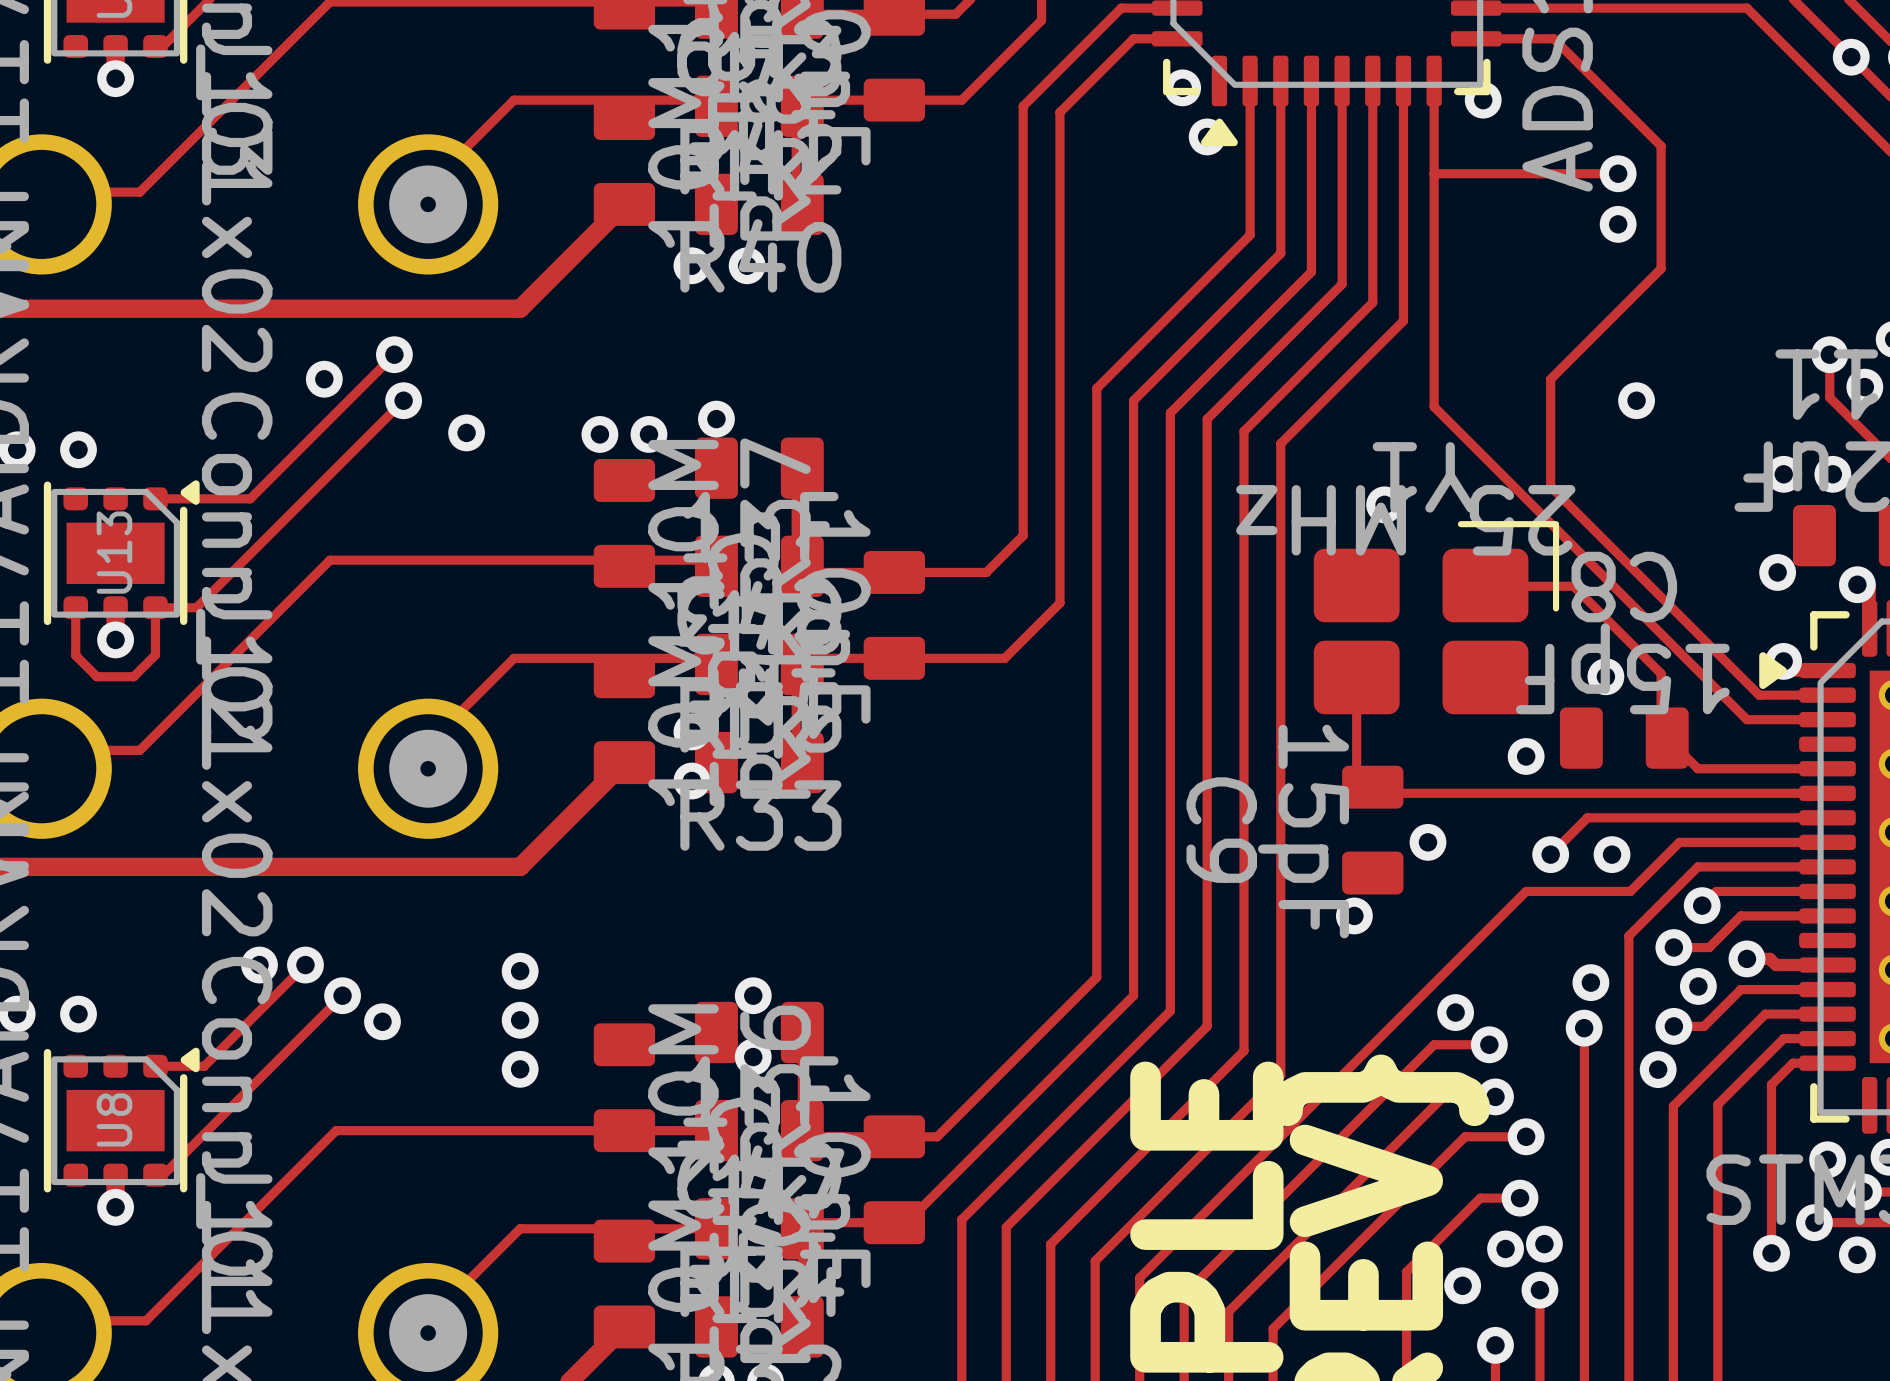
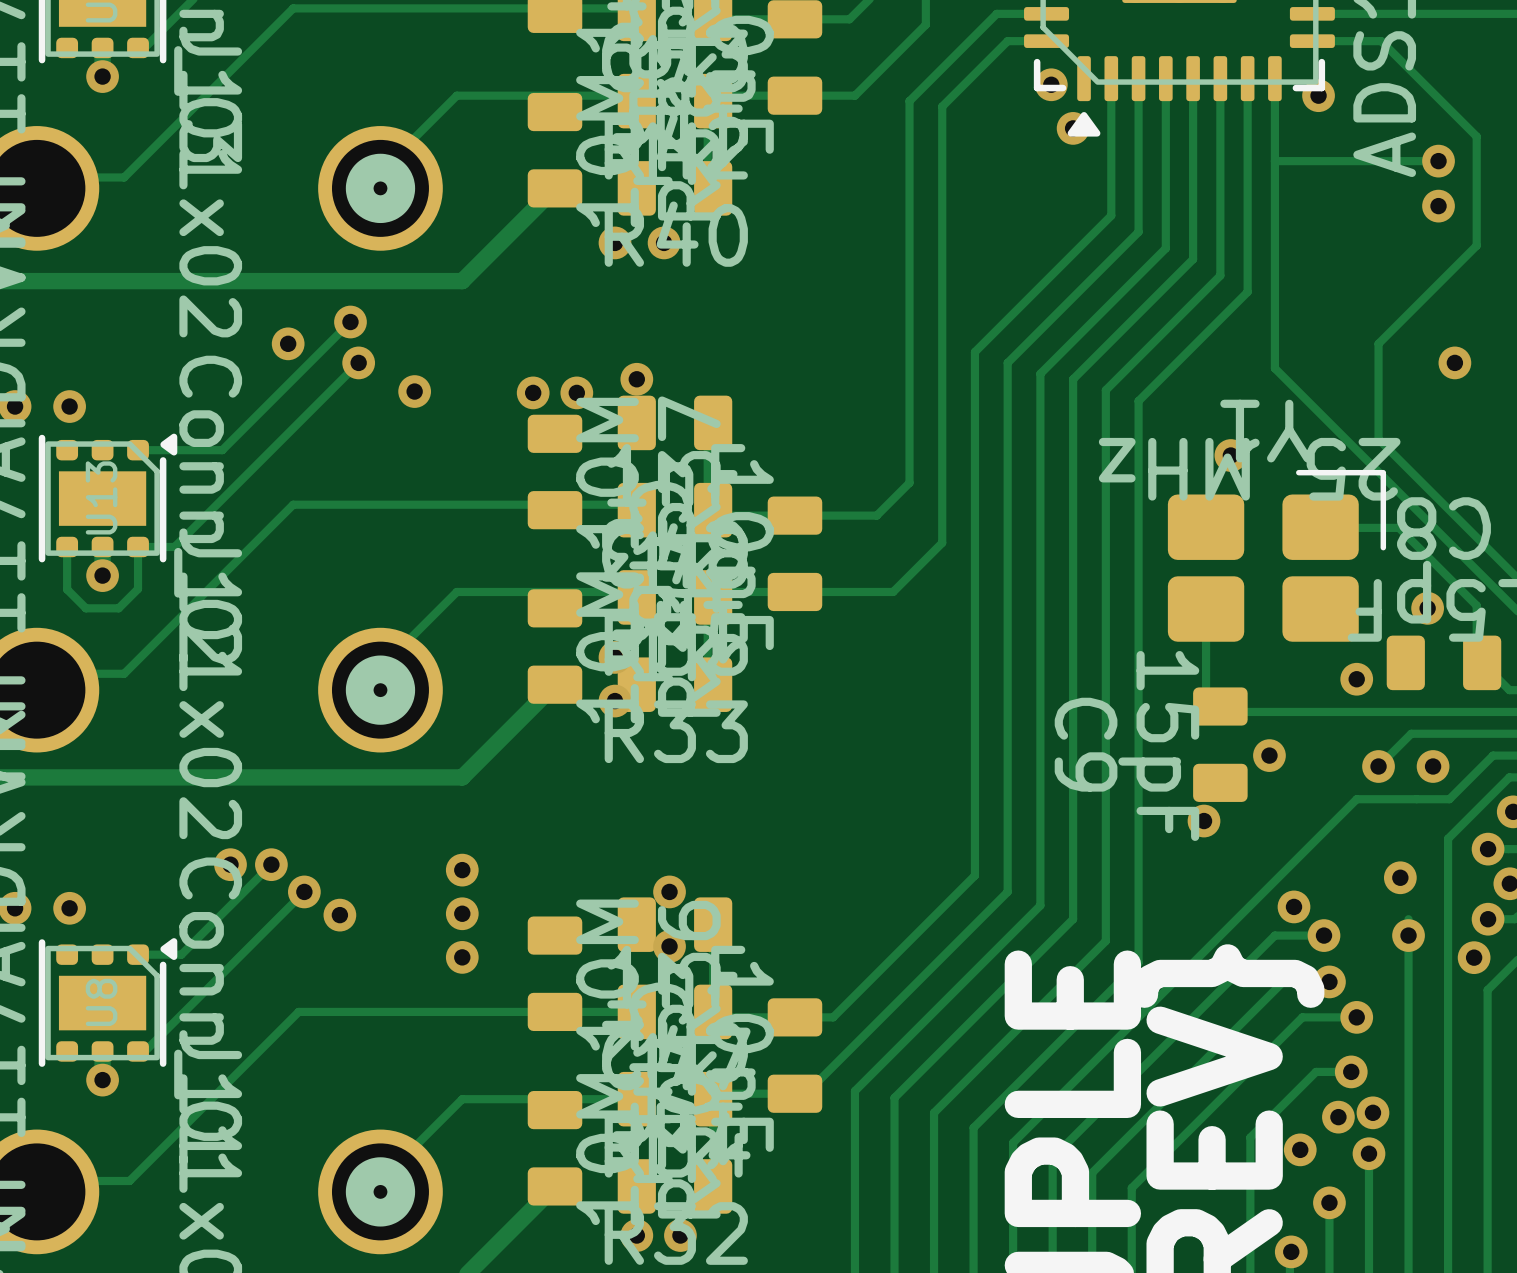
via position: (1590, 982) -> (1400, 877)
via position: (1584, 1028) -> (1408, 935)

